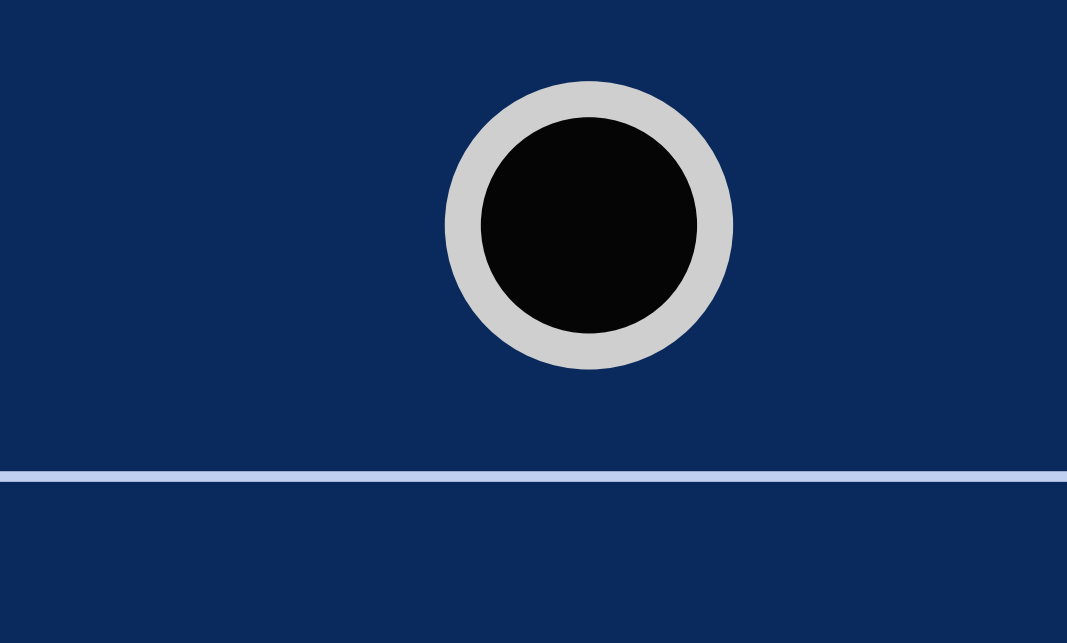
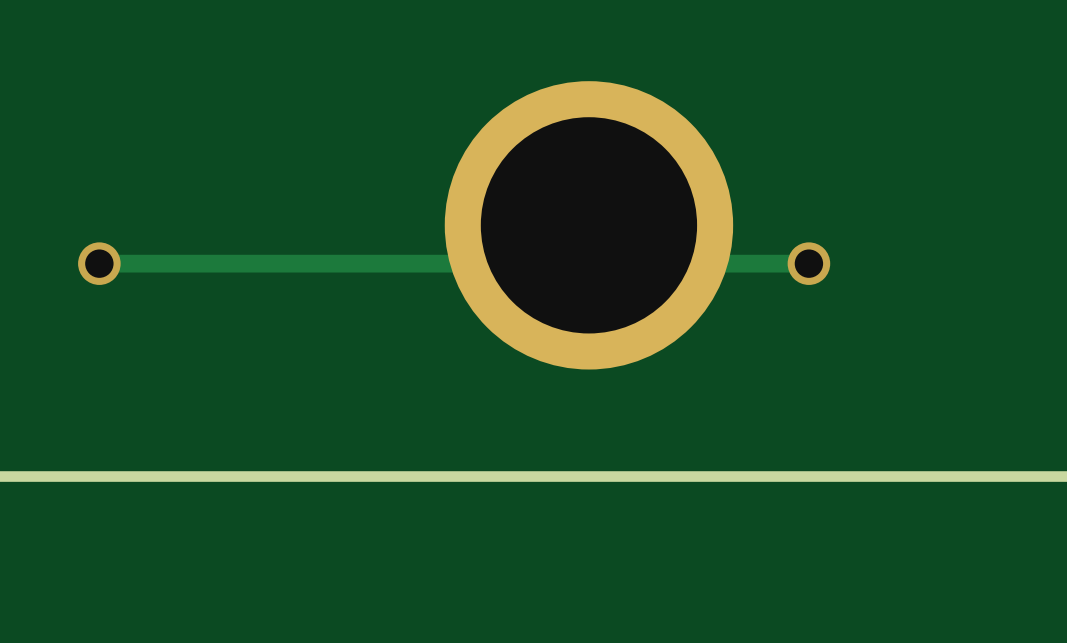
via: none -> (99, 263)
track: none -> (808, 263) (99, 263)
via: none -> (808, 263)

